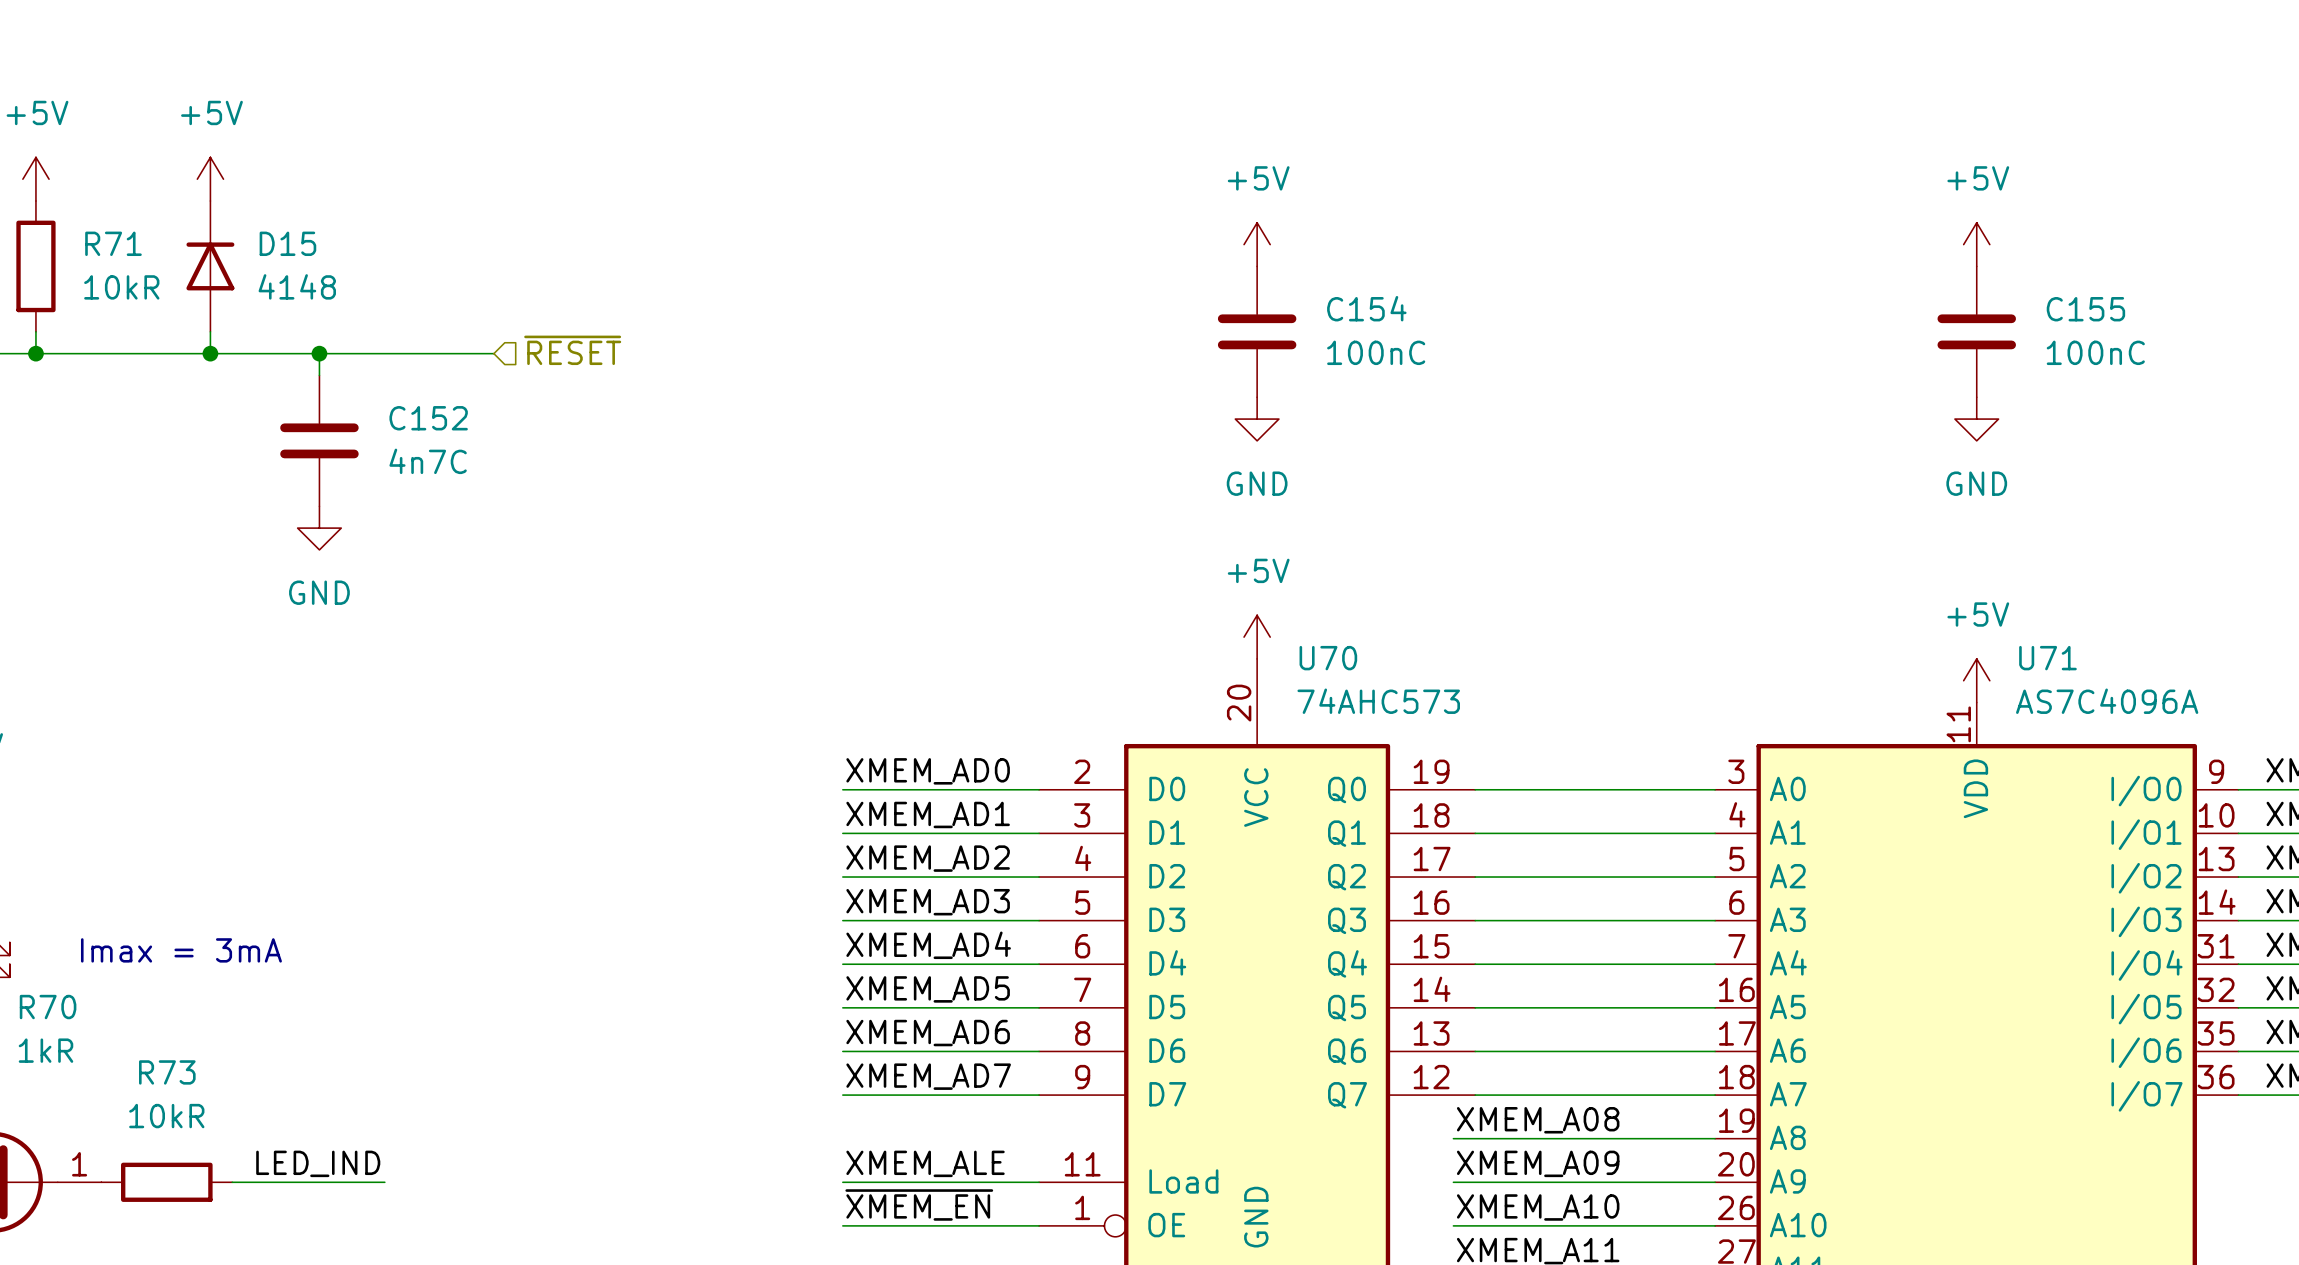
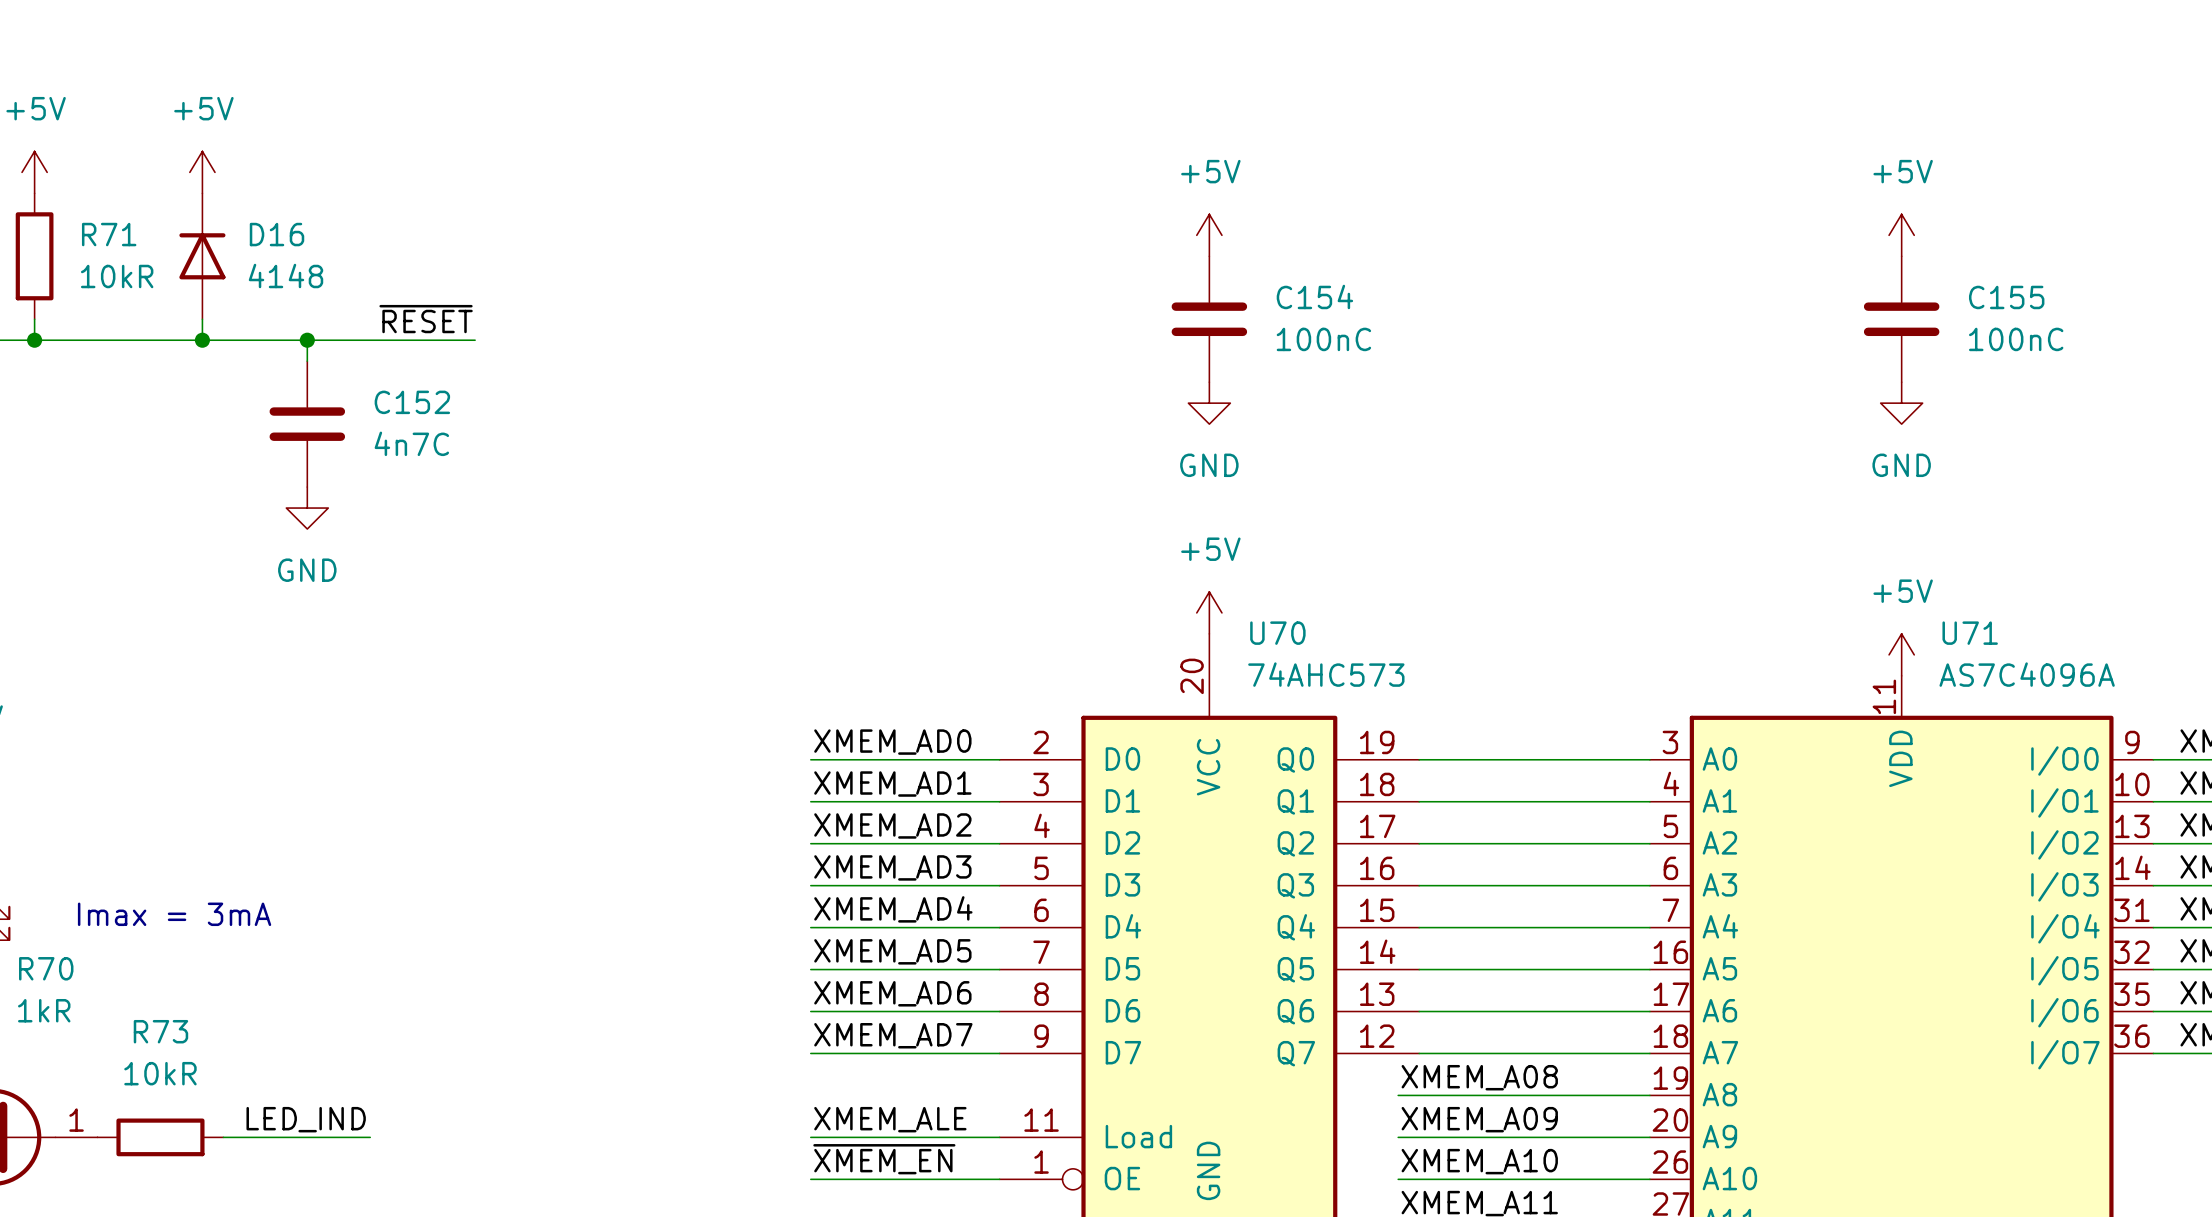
D15 name: D15 (287, 243) -> D16 (277, 234)
label: none -> ~{RESET} (426, 319)
hierarchical label: ~{RESET} (572, 350) -> none

